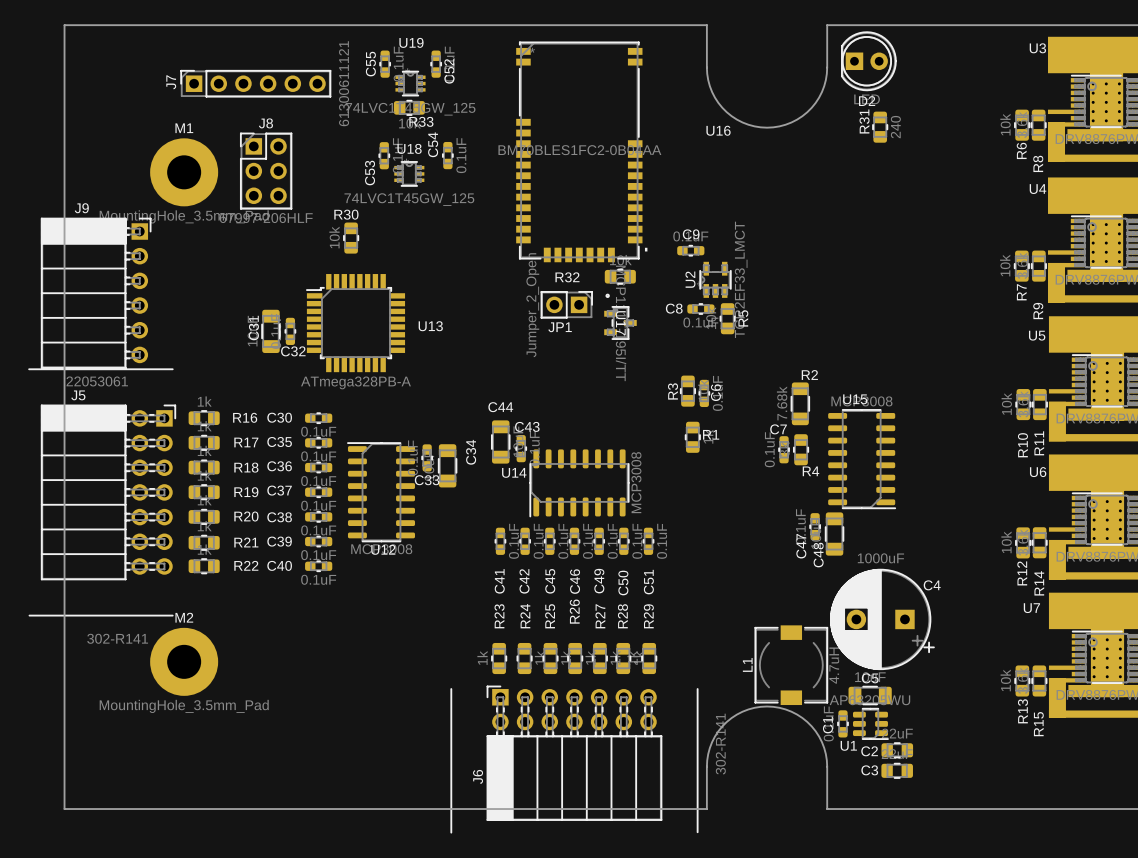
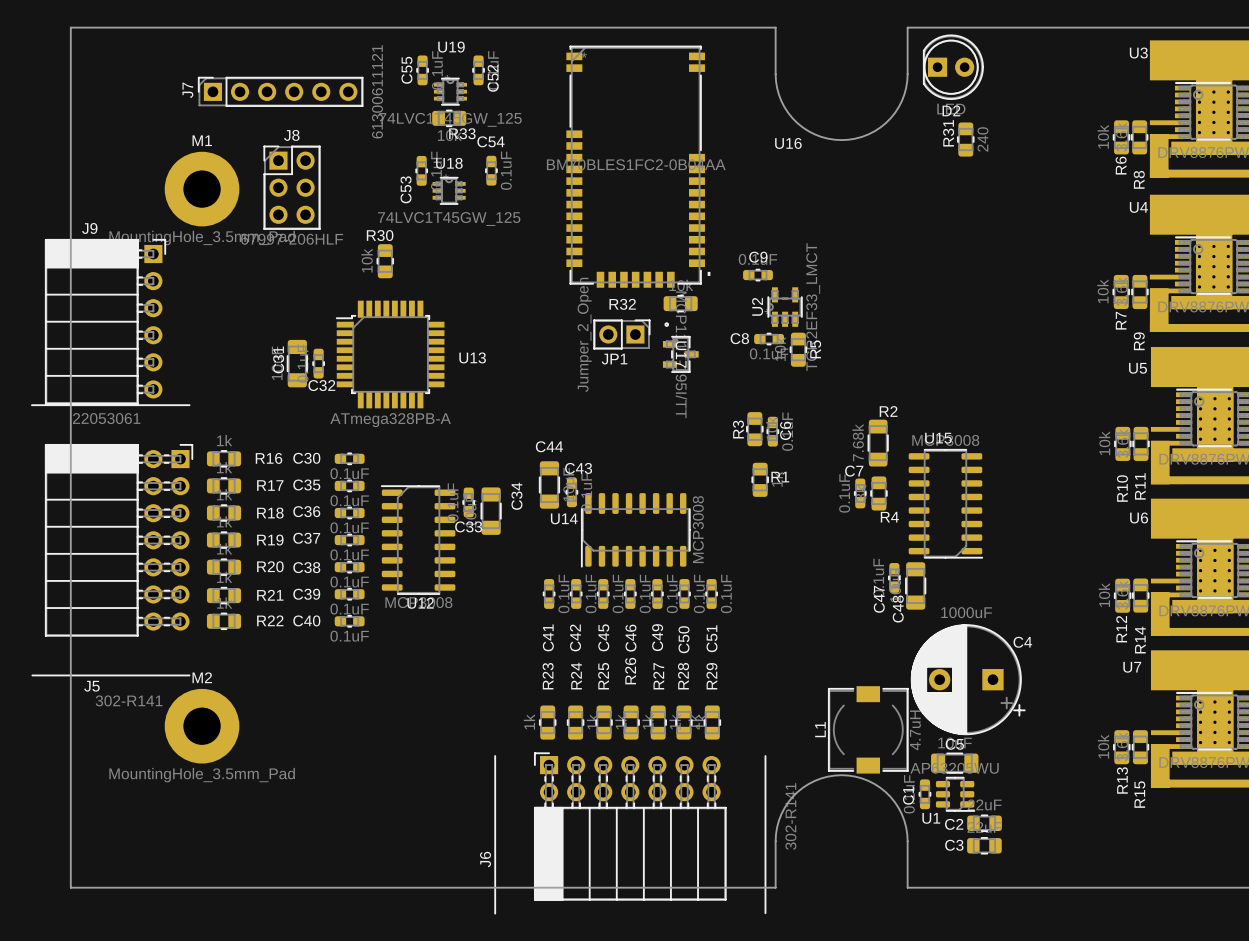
C54 name rotation: 0° (433, 144) -> 90° clockwise (490, 141)
J5 name position: J5 (78, 395) -> J5 (91, 686)
J6 name position: J6 (478, 776) -> J6 (485, 859)

